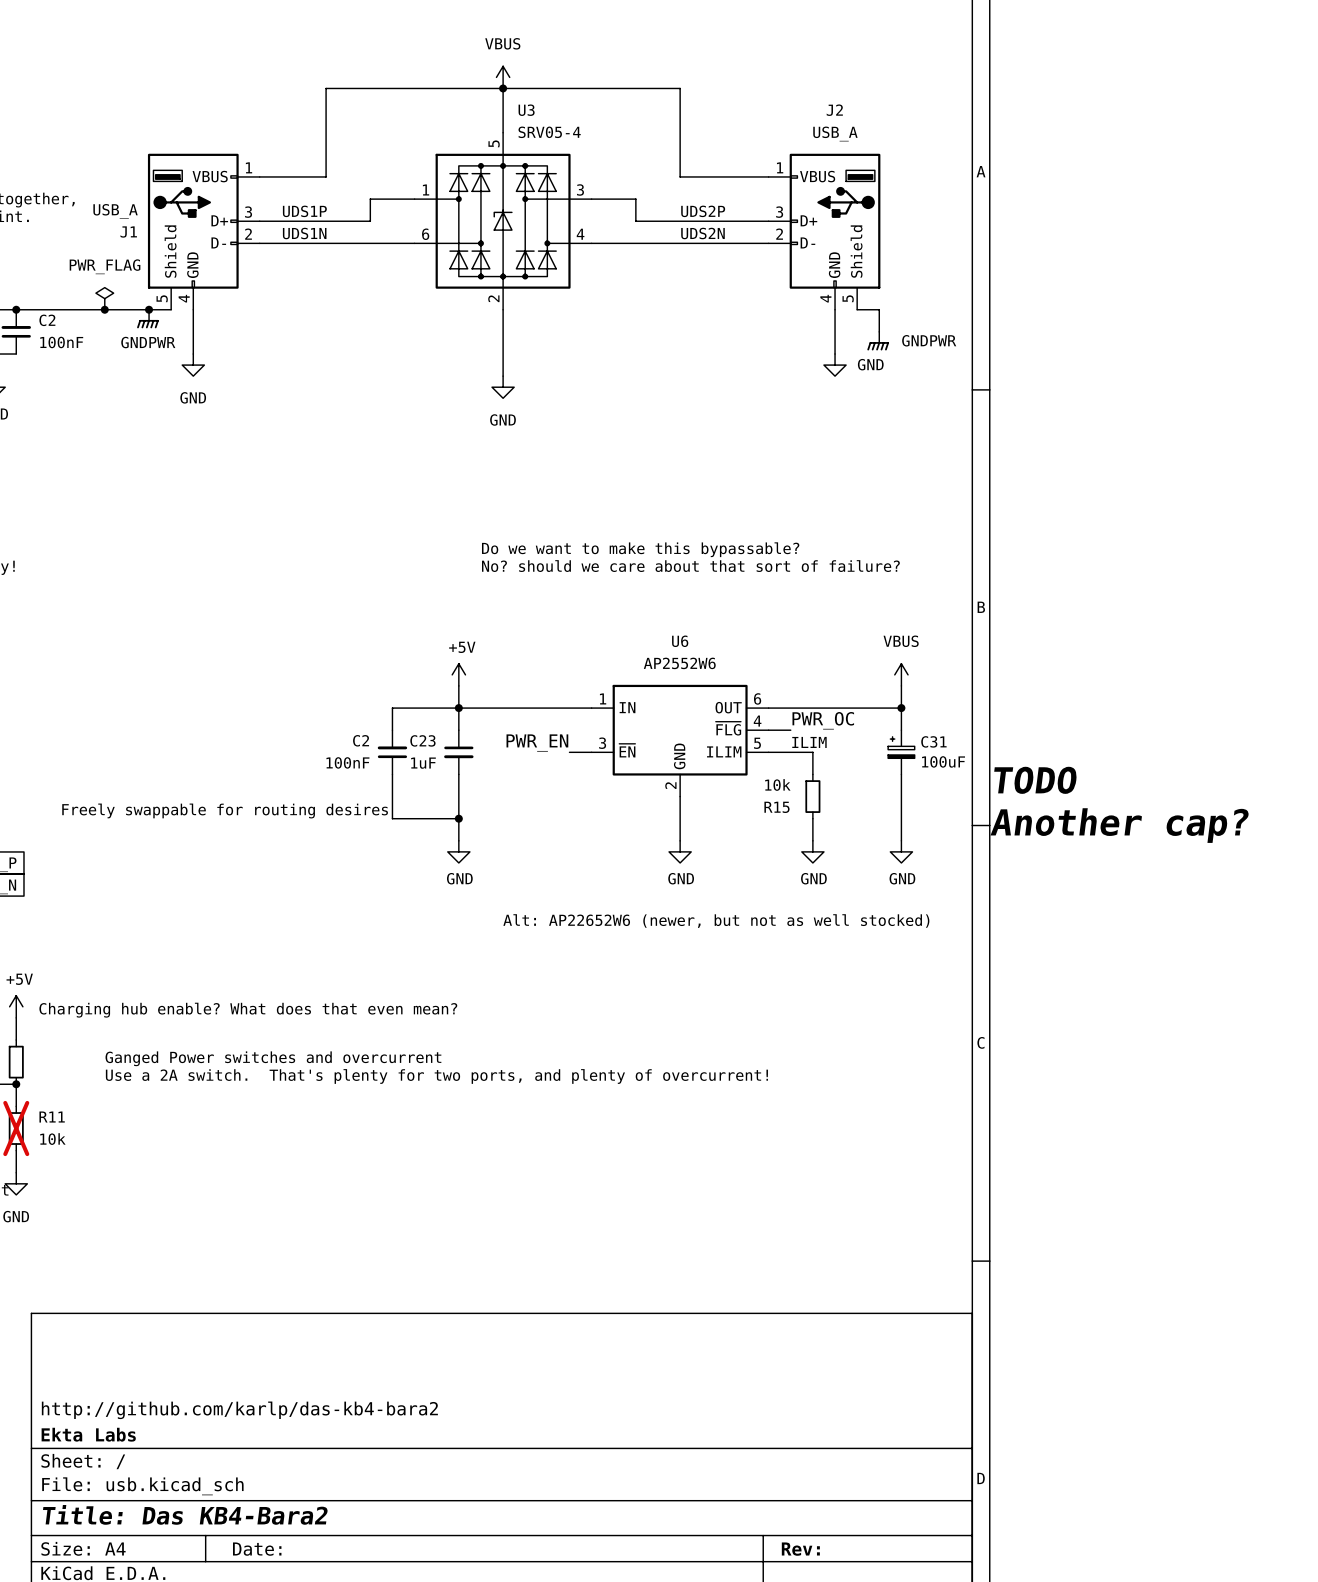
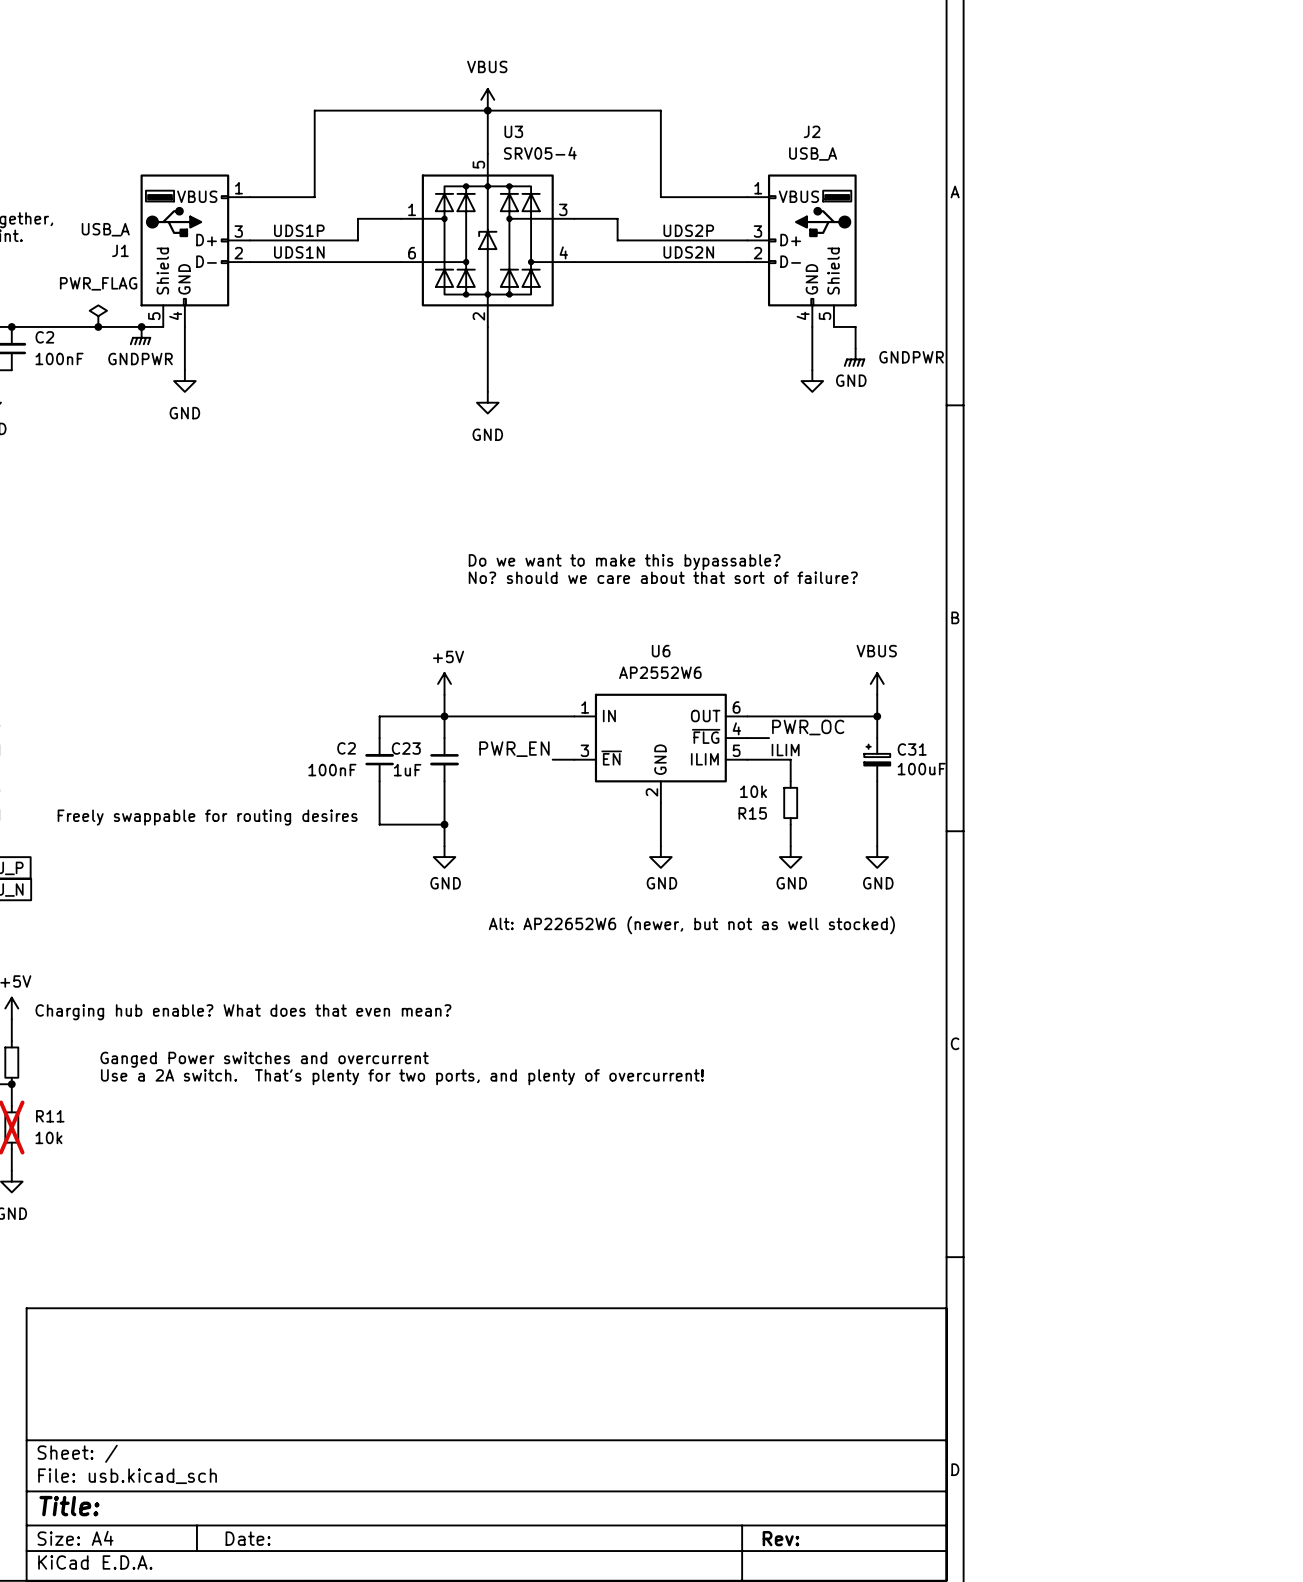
text: TODO (1035, 780) -> none
text: Another cap? (1119, 825) -> none
title block: http://github.com/karlp/das-kb4-bara2 (239, 1410) -> none
title block: Ekta Labs (88, 1434) -> none
title block: Title: Das KB4-Bara2 (185, 1514) -> Title: (69, 1506)

